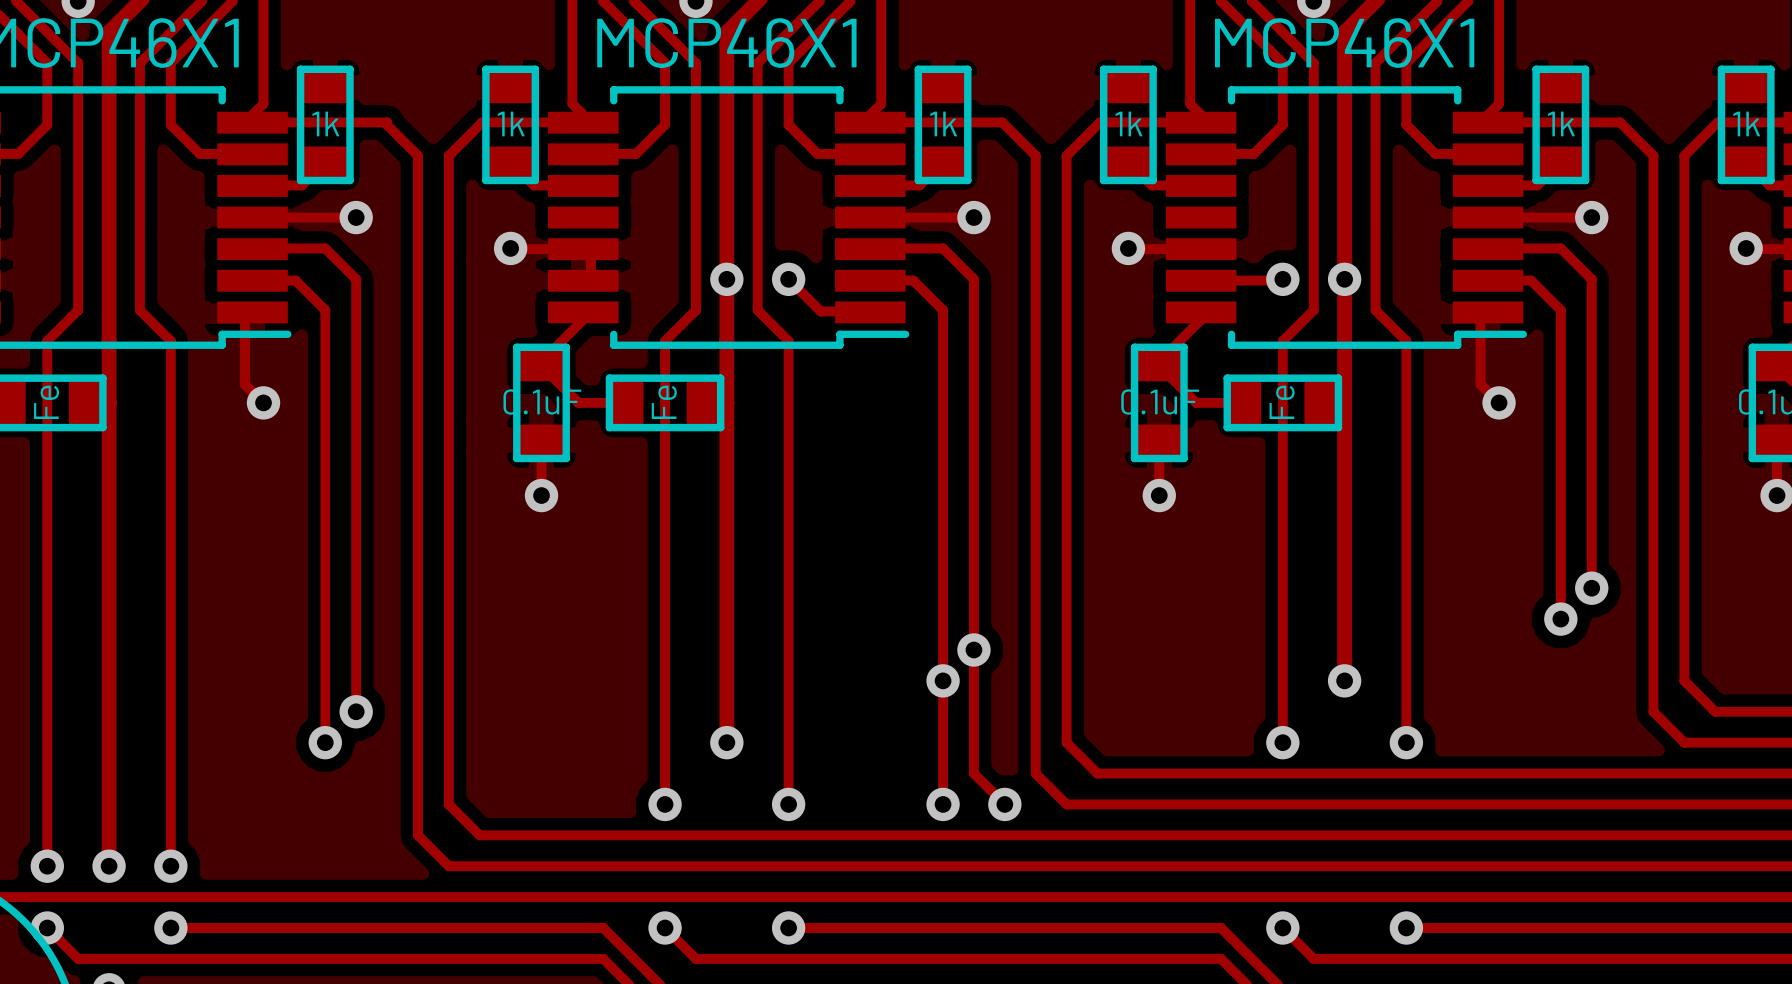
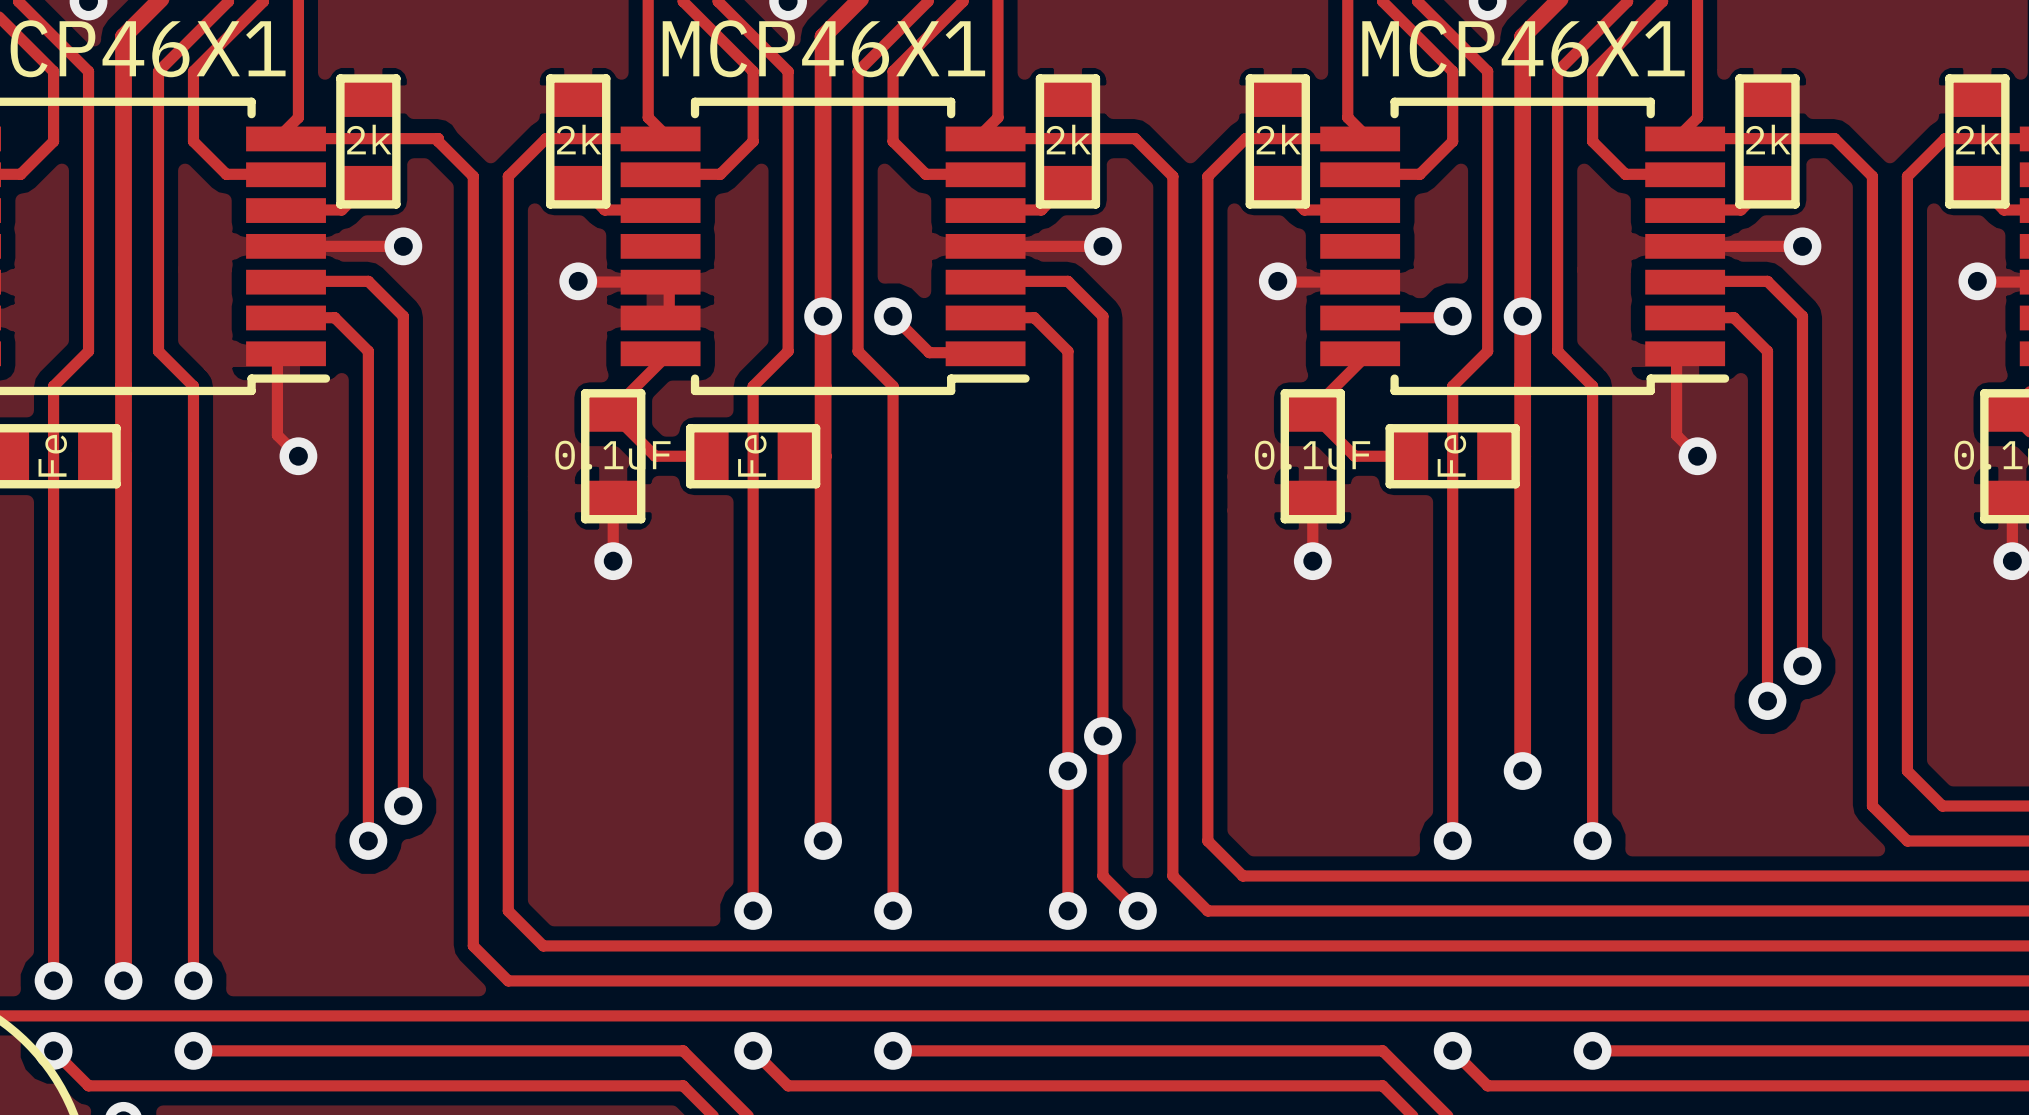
part value: 1k (325, 123) -> 2k (369, 139)
part value: 1k (511, 123) -> 2k (579, 139)
part value: 1k (943, 123) -> 2k (1068, 139)
part value: 1k (1128, 123) -> 2k (1278, 139)
part value: 1k (1561, 123) -> 2k (1768, 139)
part value: 1k (1746, 123) -> 2k (1978, 139)

